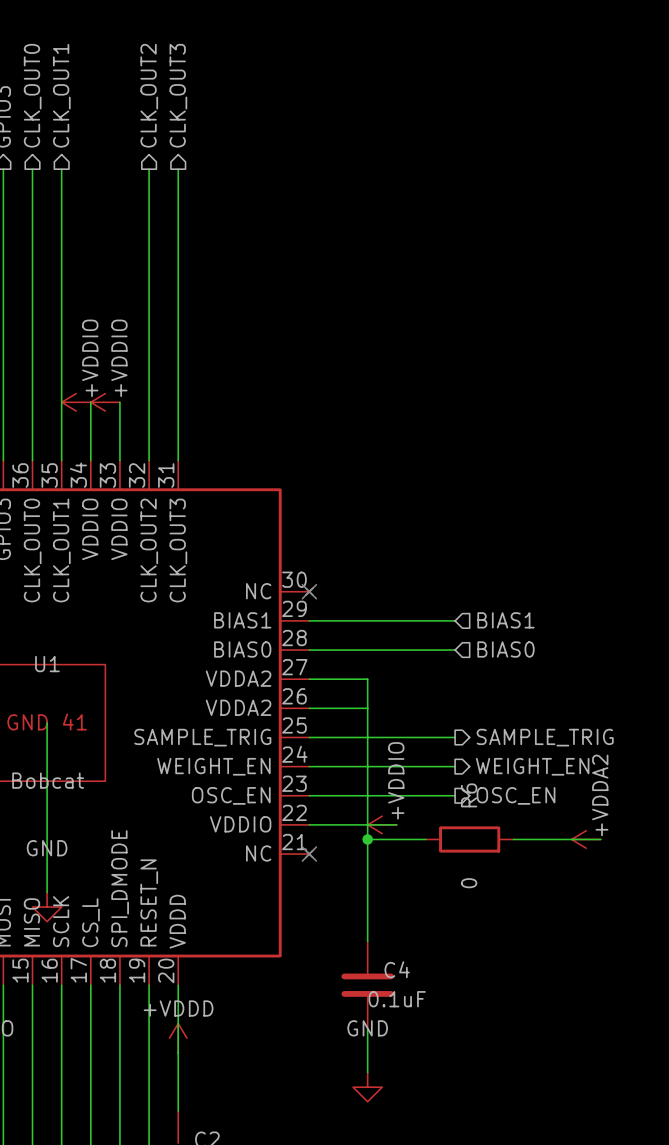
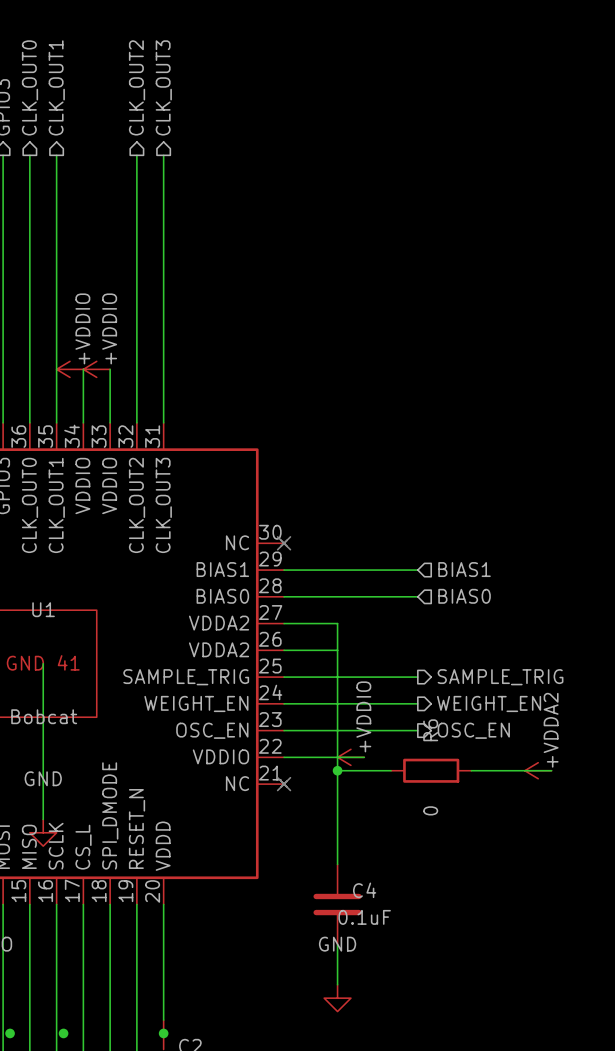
power symbol: +VDDD (178, 1038) -> none
junction: none -> (10, 1033)
junction: none -> (63, 1033)
junction: none -> (163, 1033)

